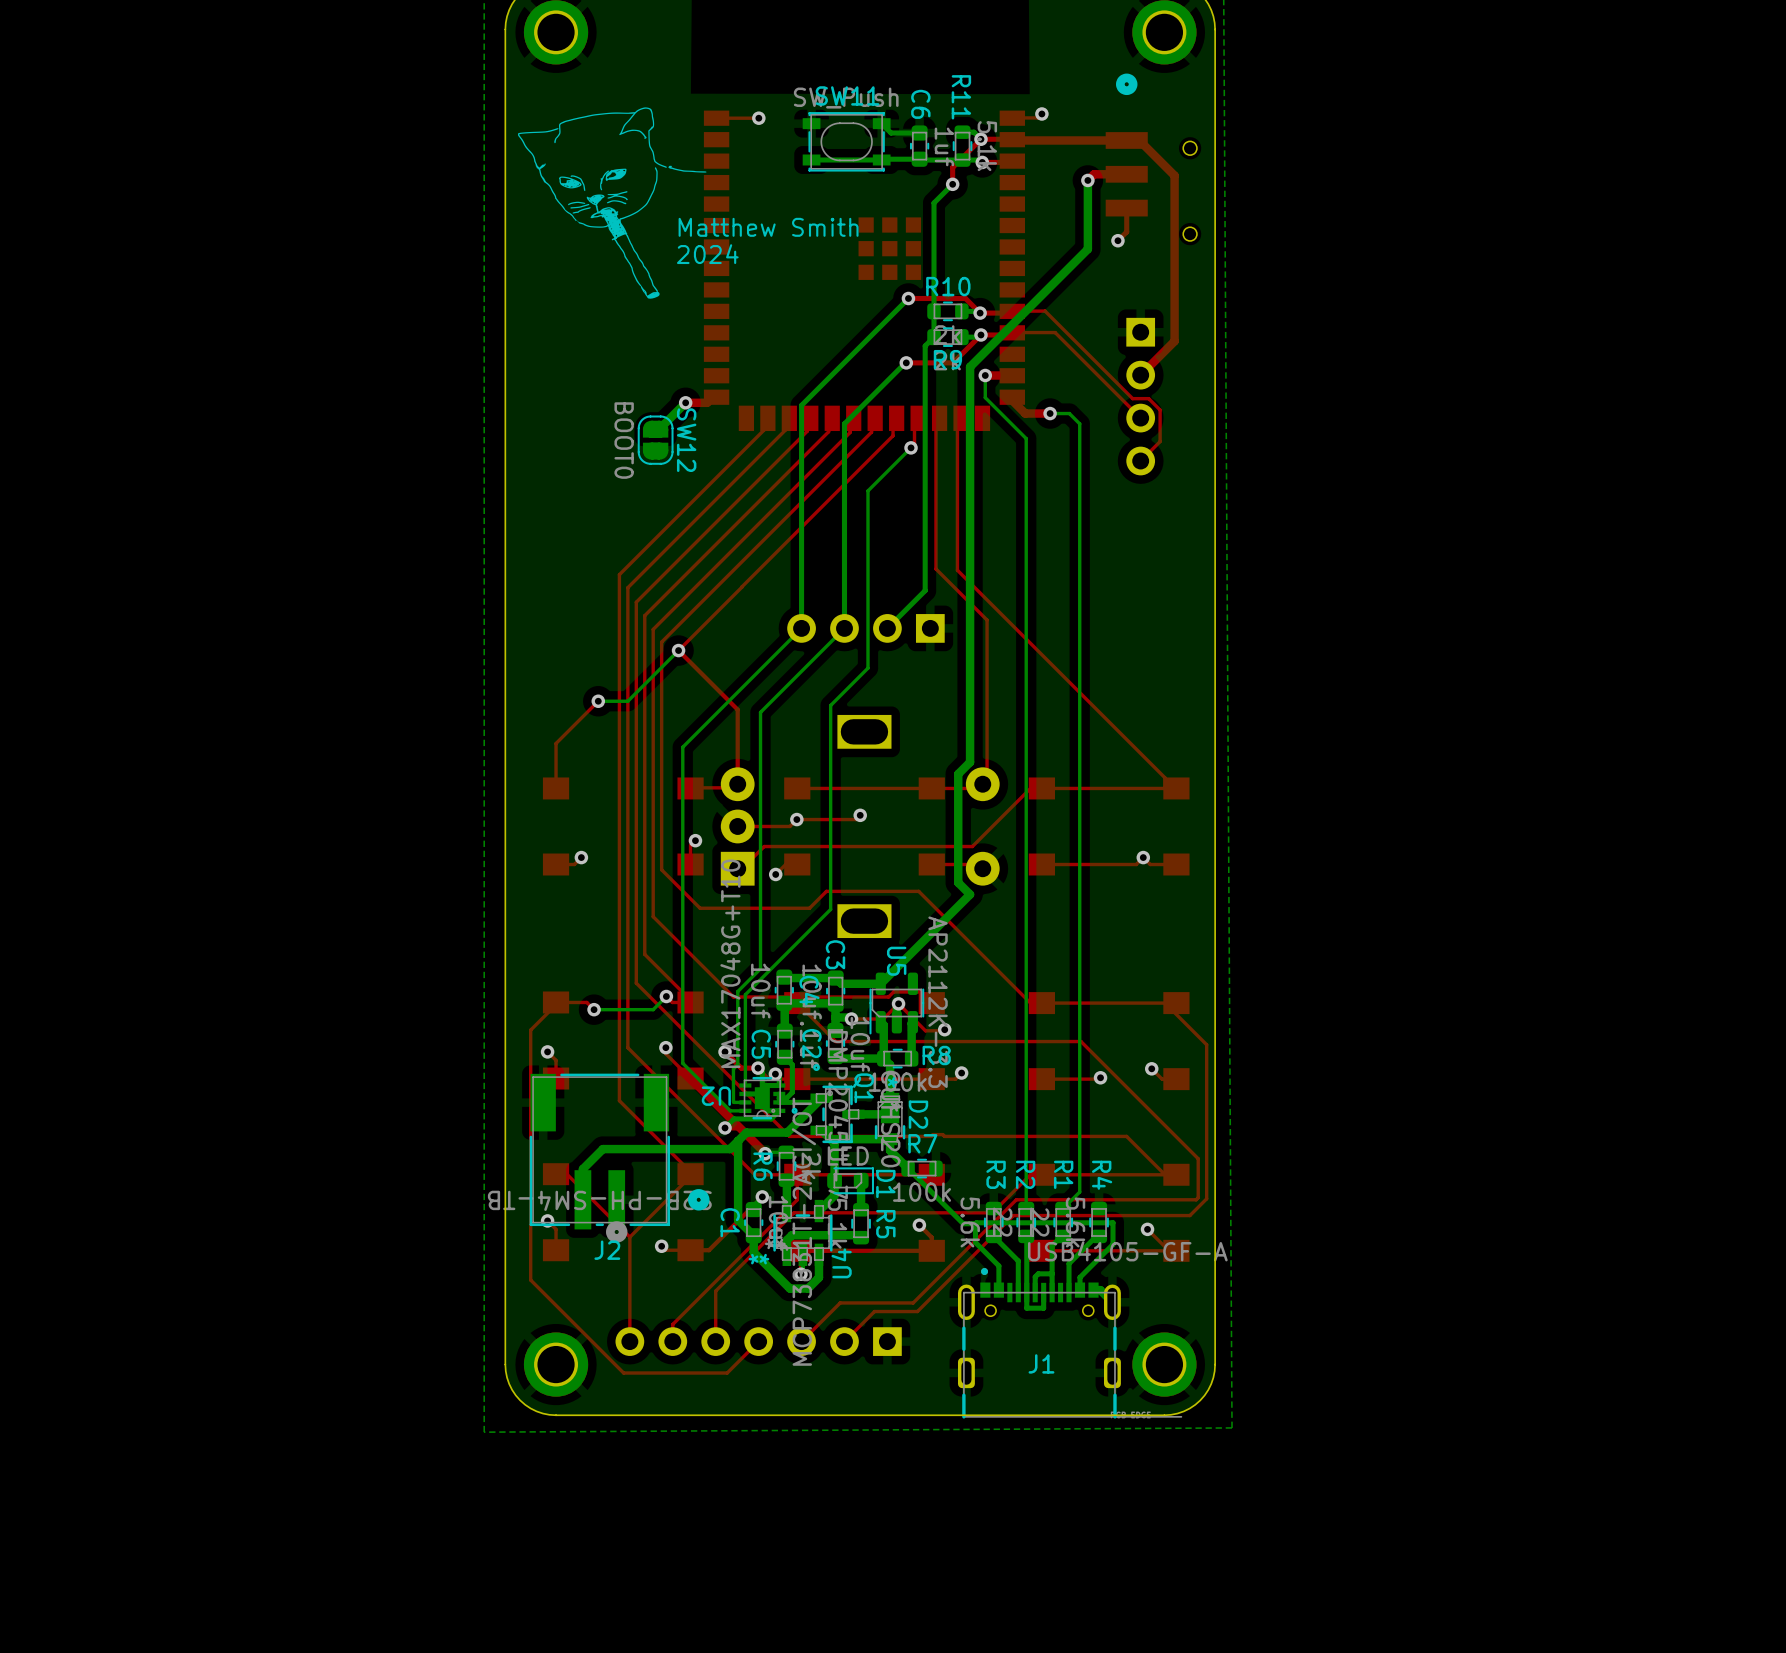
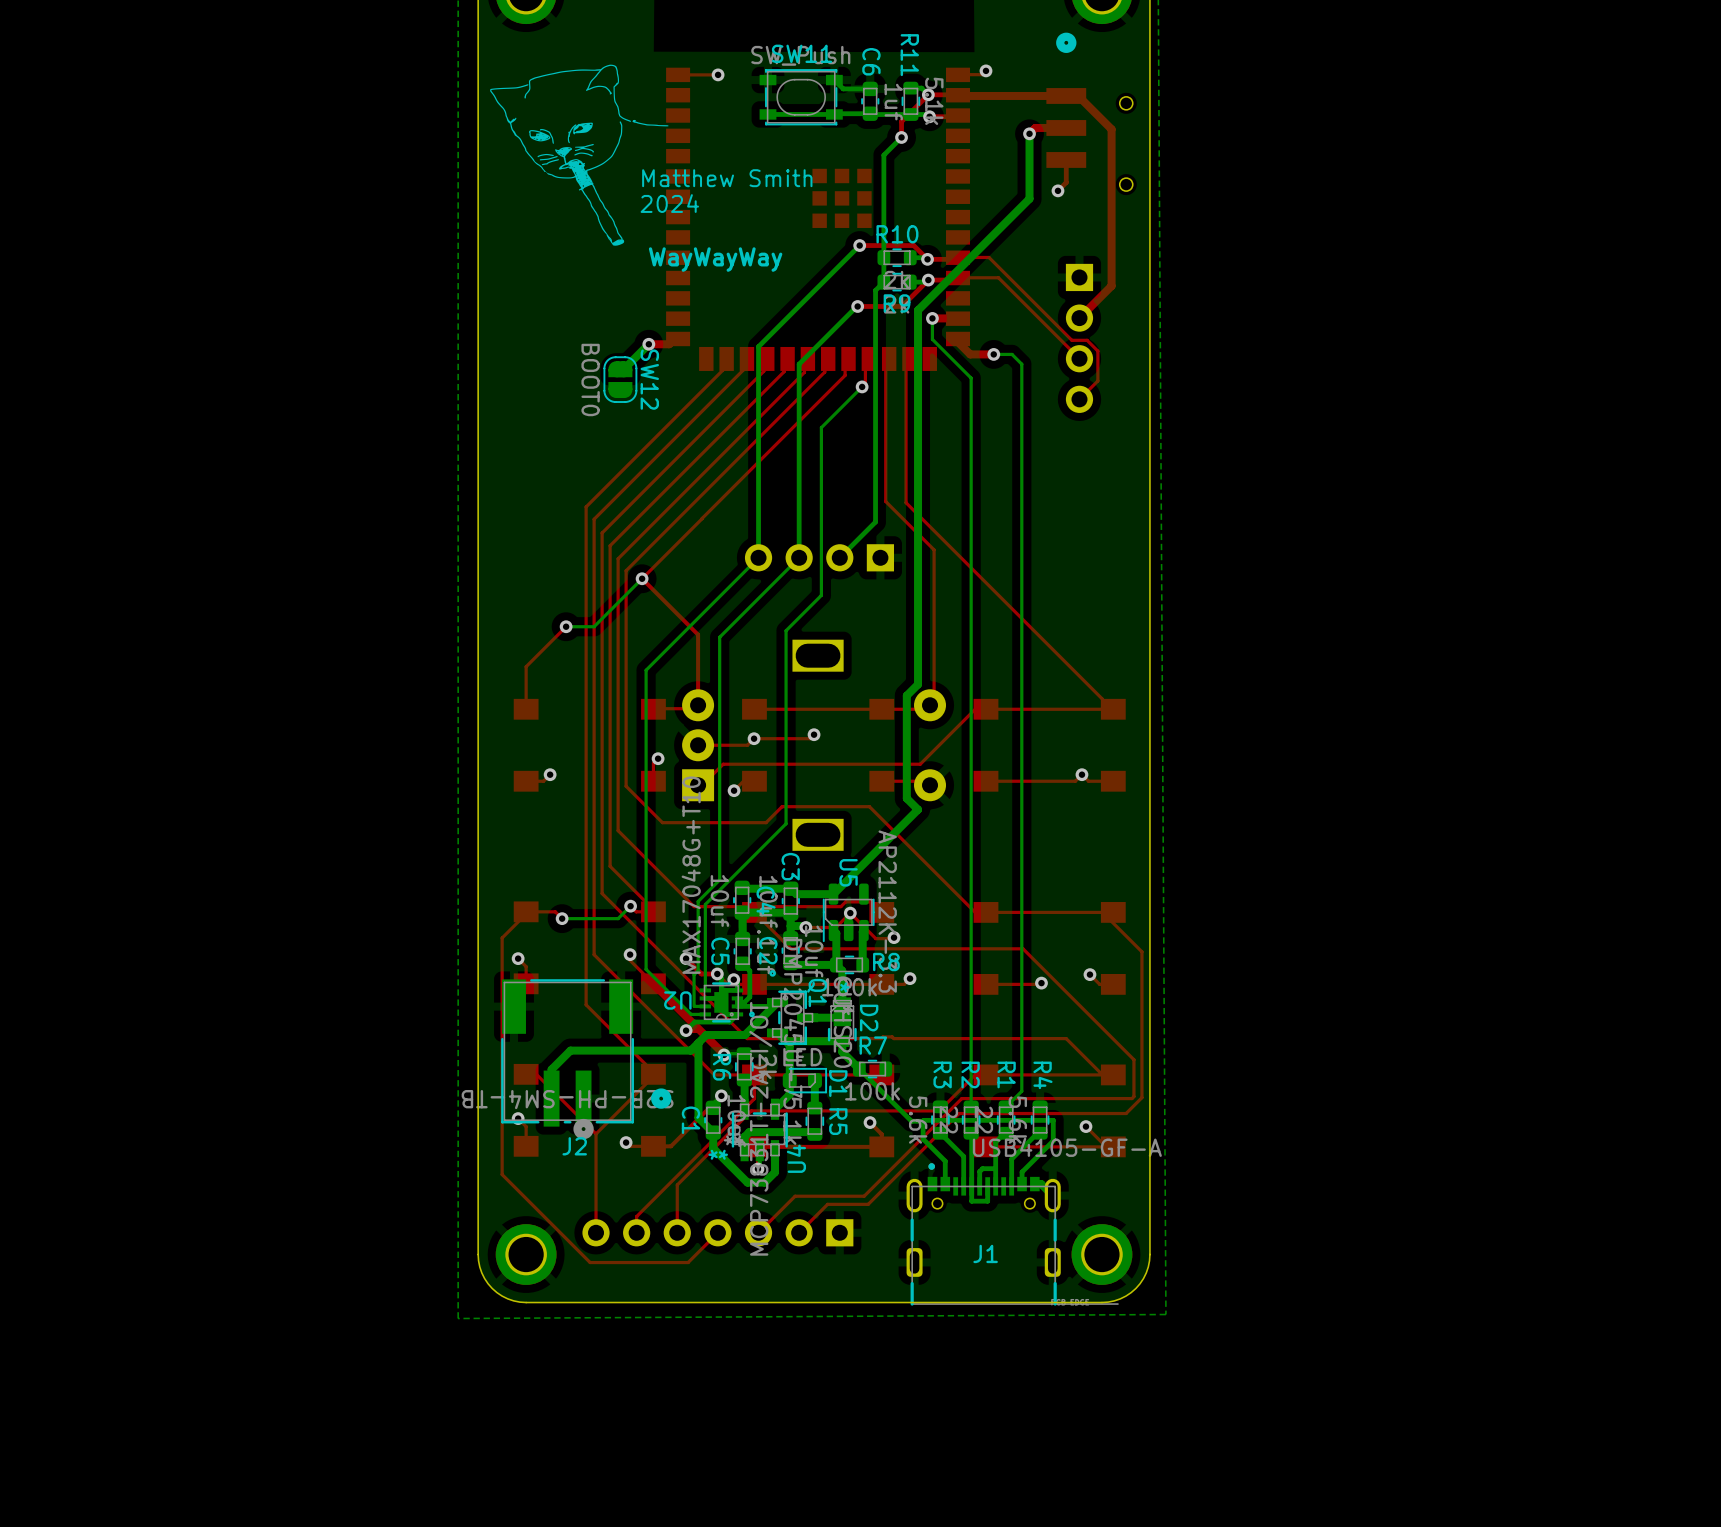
text: none -> WayWayWay (715, 259)

